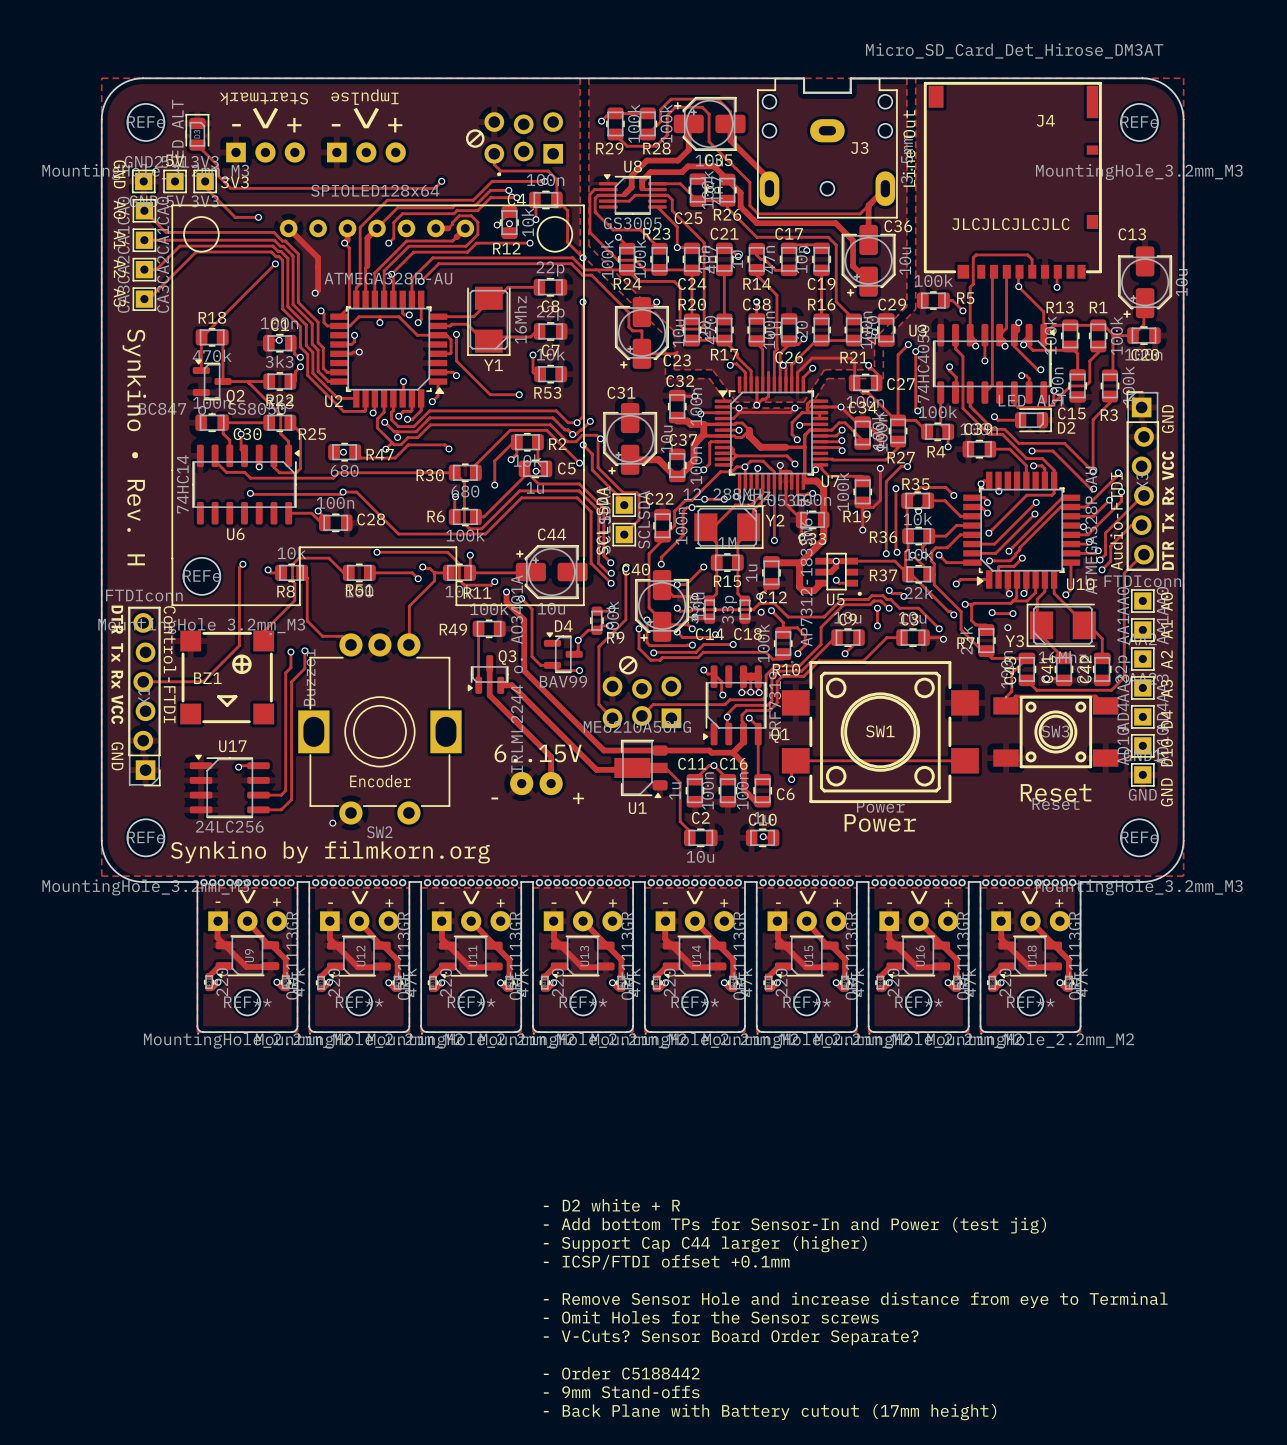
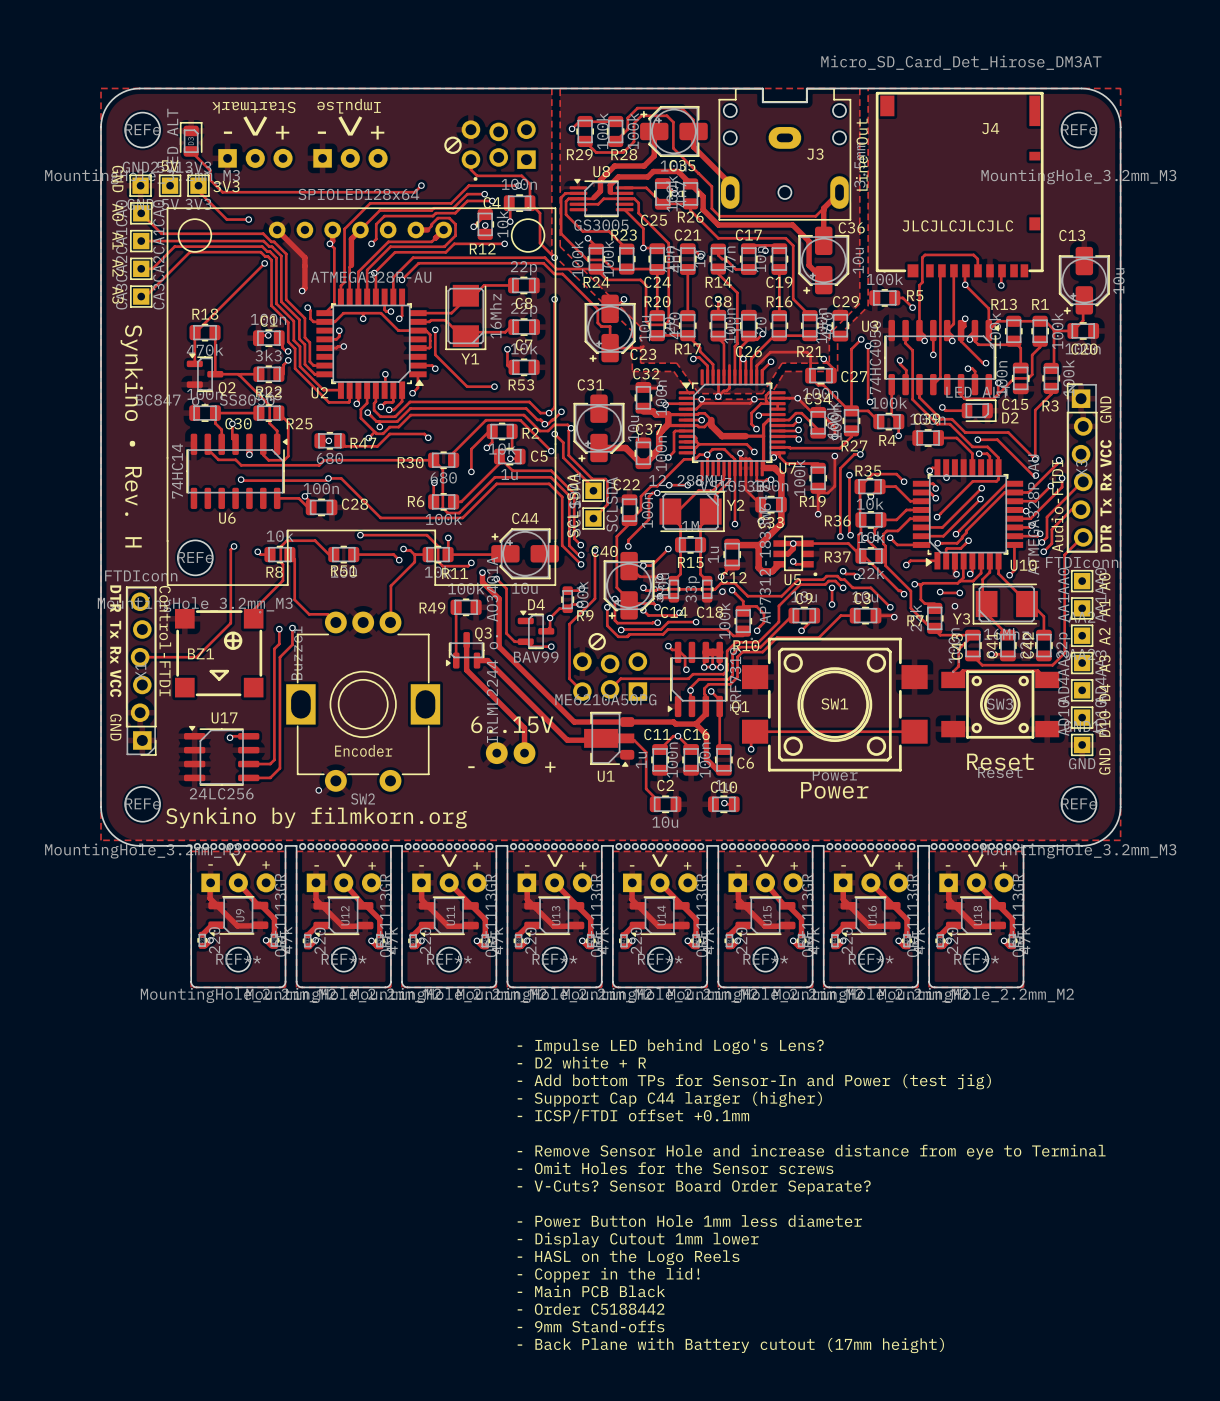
text: none -> - Impulse LED behind Logo's Lens? (670, 1046)
text: none -> - D2 white + R (581, 1062)
text: none -> - Add bottom TPs for Sensor-In and Power (test jig) (754, 1081)
text: none -> - Support Cap C44 larger (higher) (669, 1099)
text: - D2 white + R (611, 1205) -> - Remove Sensor Hole and increase distance from eye to Terminal (811, 1152)
text: - Add bottom TPs for Sensor-In and Power (test jig) (794, 1225) -> - Omit Holes for the Sensor screws (675, 1168)
text: - Support Cap C44 larger (higher) (705, 1244) -> - V-Cuts? Sensor Board Order Separate? (694, 1187)
text position: - ICSP/FTDI offset +0.1mm (666, 1262) -> - ICSP/FTDI offset +0.1mm (633, 1116)
text: none -> - Power Button Hole 1mm less diameter (689, 1220)
text: - Remove Sensor Hole and increase distance from eye to Terminal (855, 1300) -> - Display Cutout 1mm lower (638, 1240)
text: - Omit Holes for the Sensor screws (711, 1317) -> - HASL on the Logo Reels (628, 1257)
text: - V-Cuts? Sensor Board Order Separate? (731, 1337) -> - Copper in the lid! (608, 1275)
text: none -> - Main PCB Black (591, 1291)

